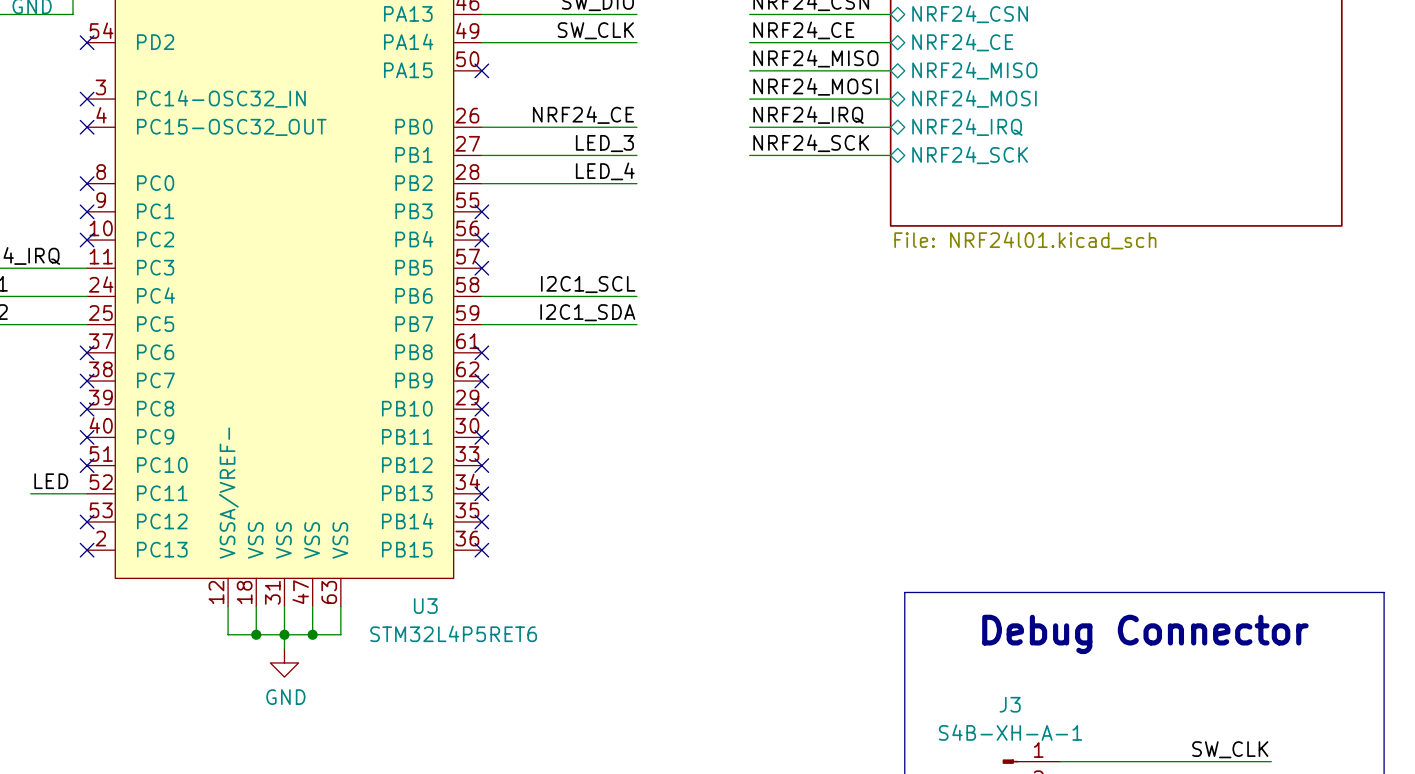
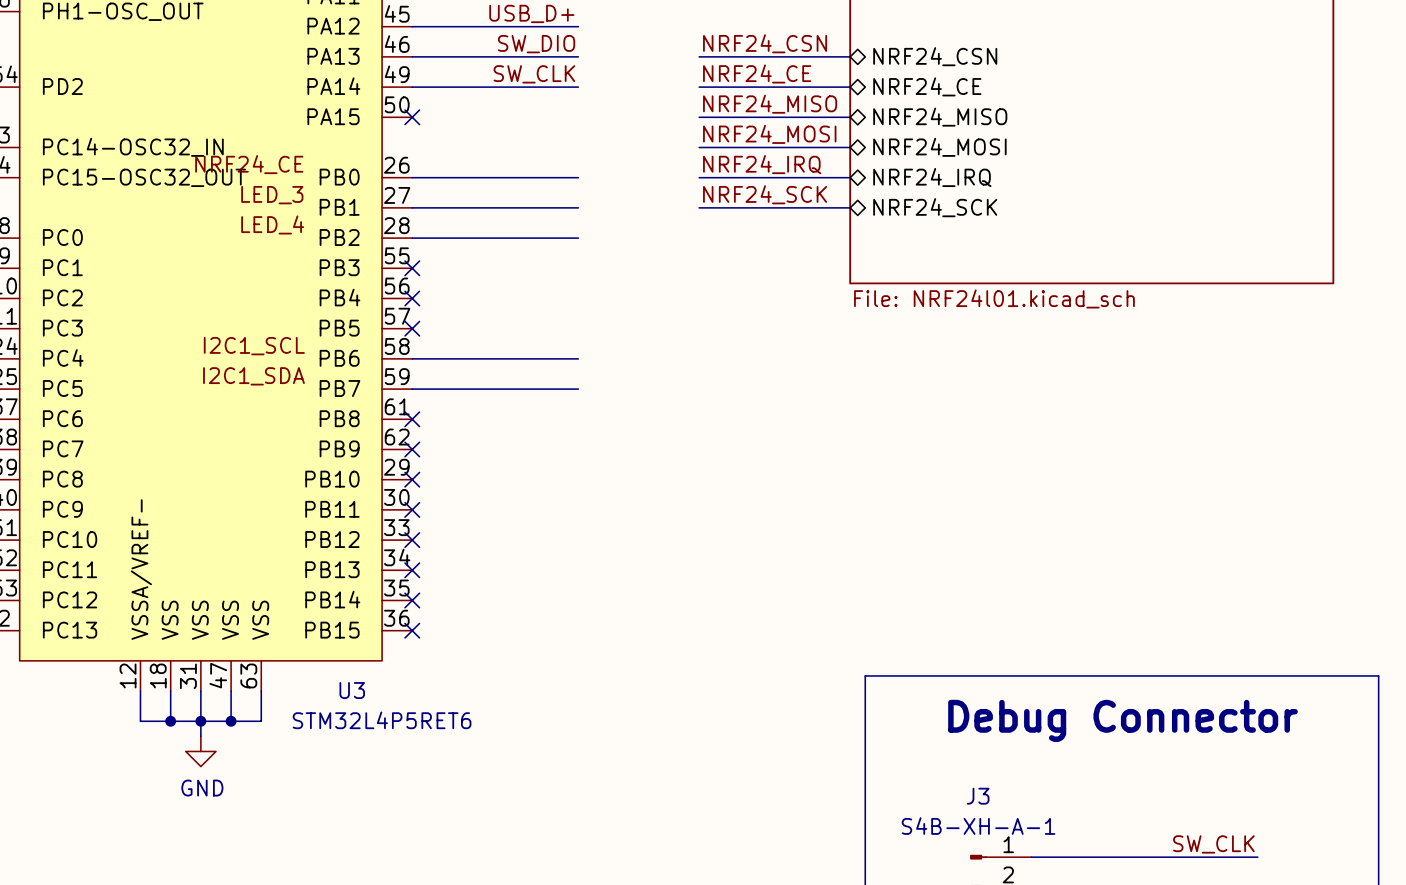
label position: NRF24_CE (583, 115) -> NRF24_CE (249, 164)
label position: LED_3 (604, 143) -> LED_3 (272, 195)
label position: LED_4 (605, 171) -> LED_4 (272, 224)
label position: I2C1_SCL (588, 284) -> I2C1_SCL (254, 346)
label position: I2C1_SDA (587, 312) -> I2C1_SDA (253, 376)

